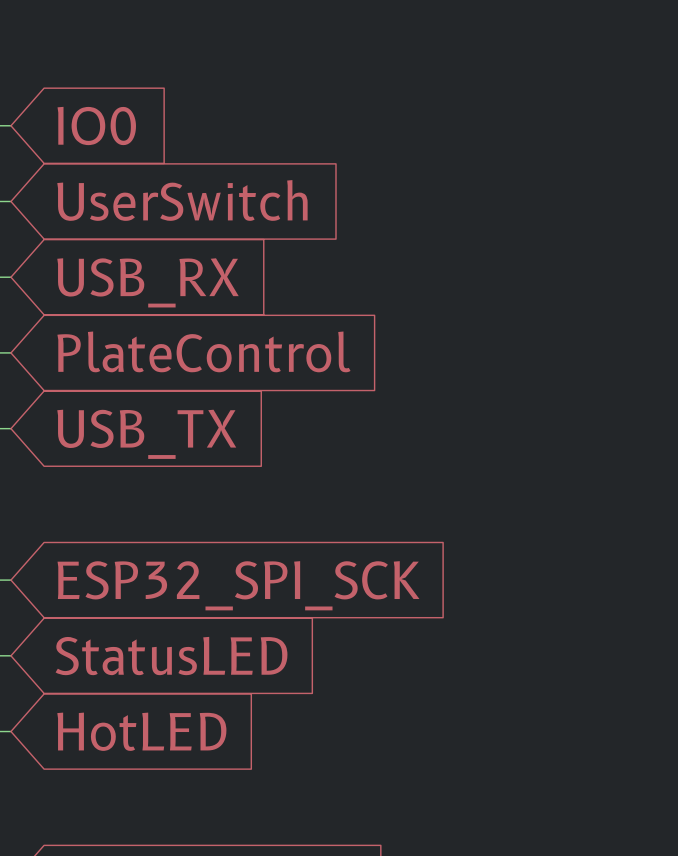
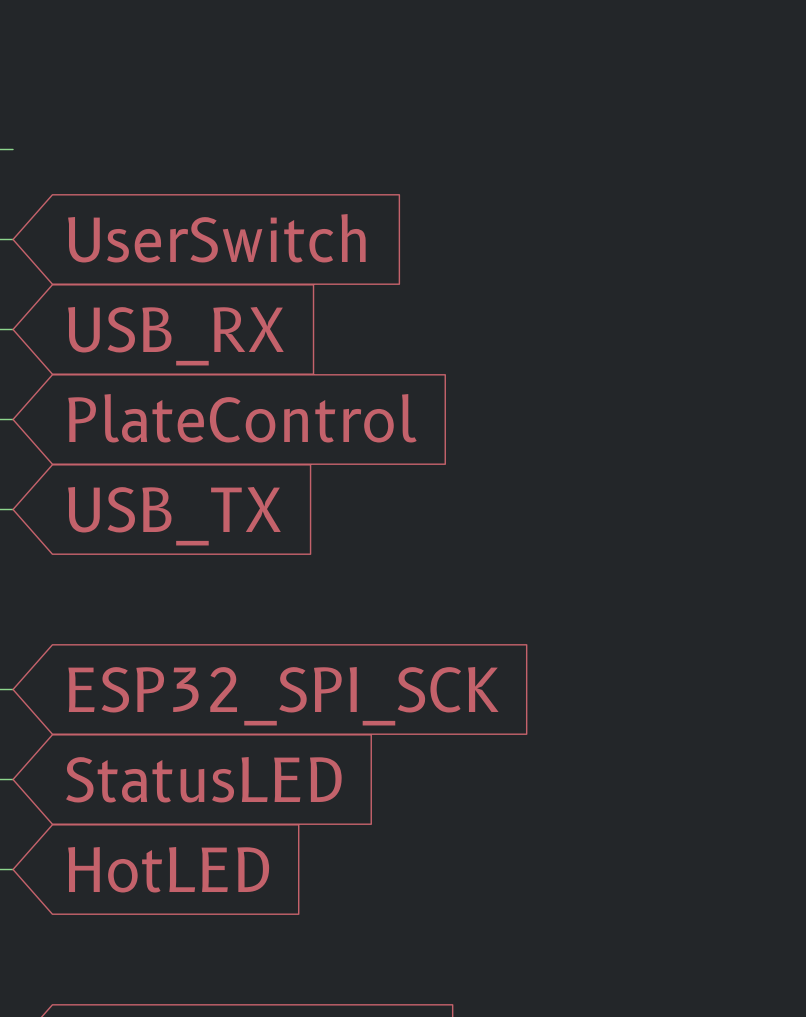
global label: IO0 (96, 125) -> none

